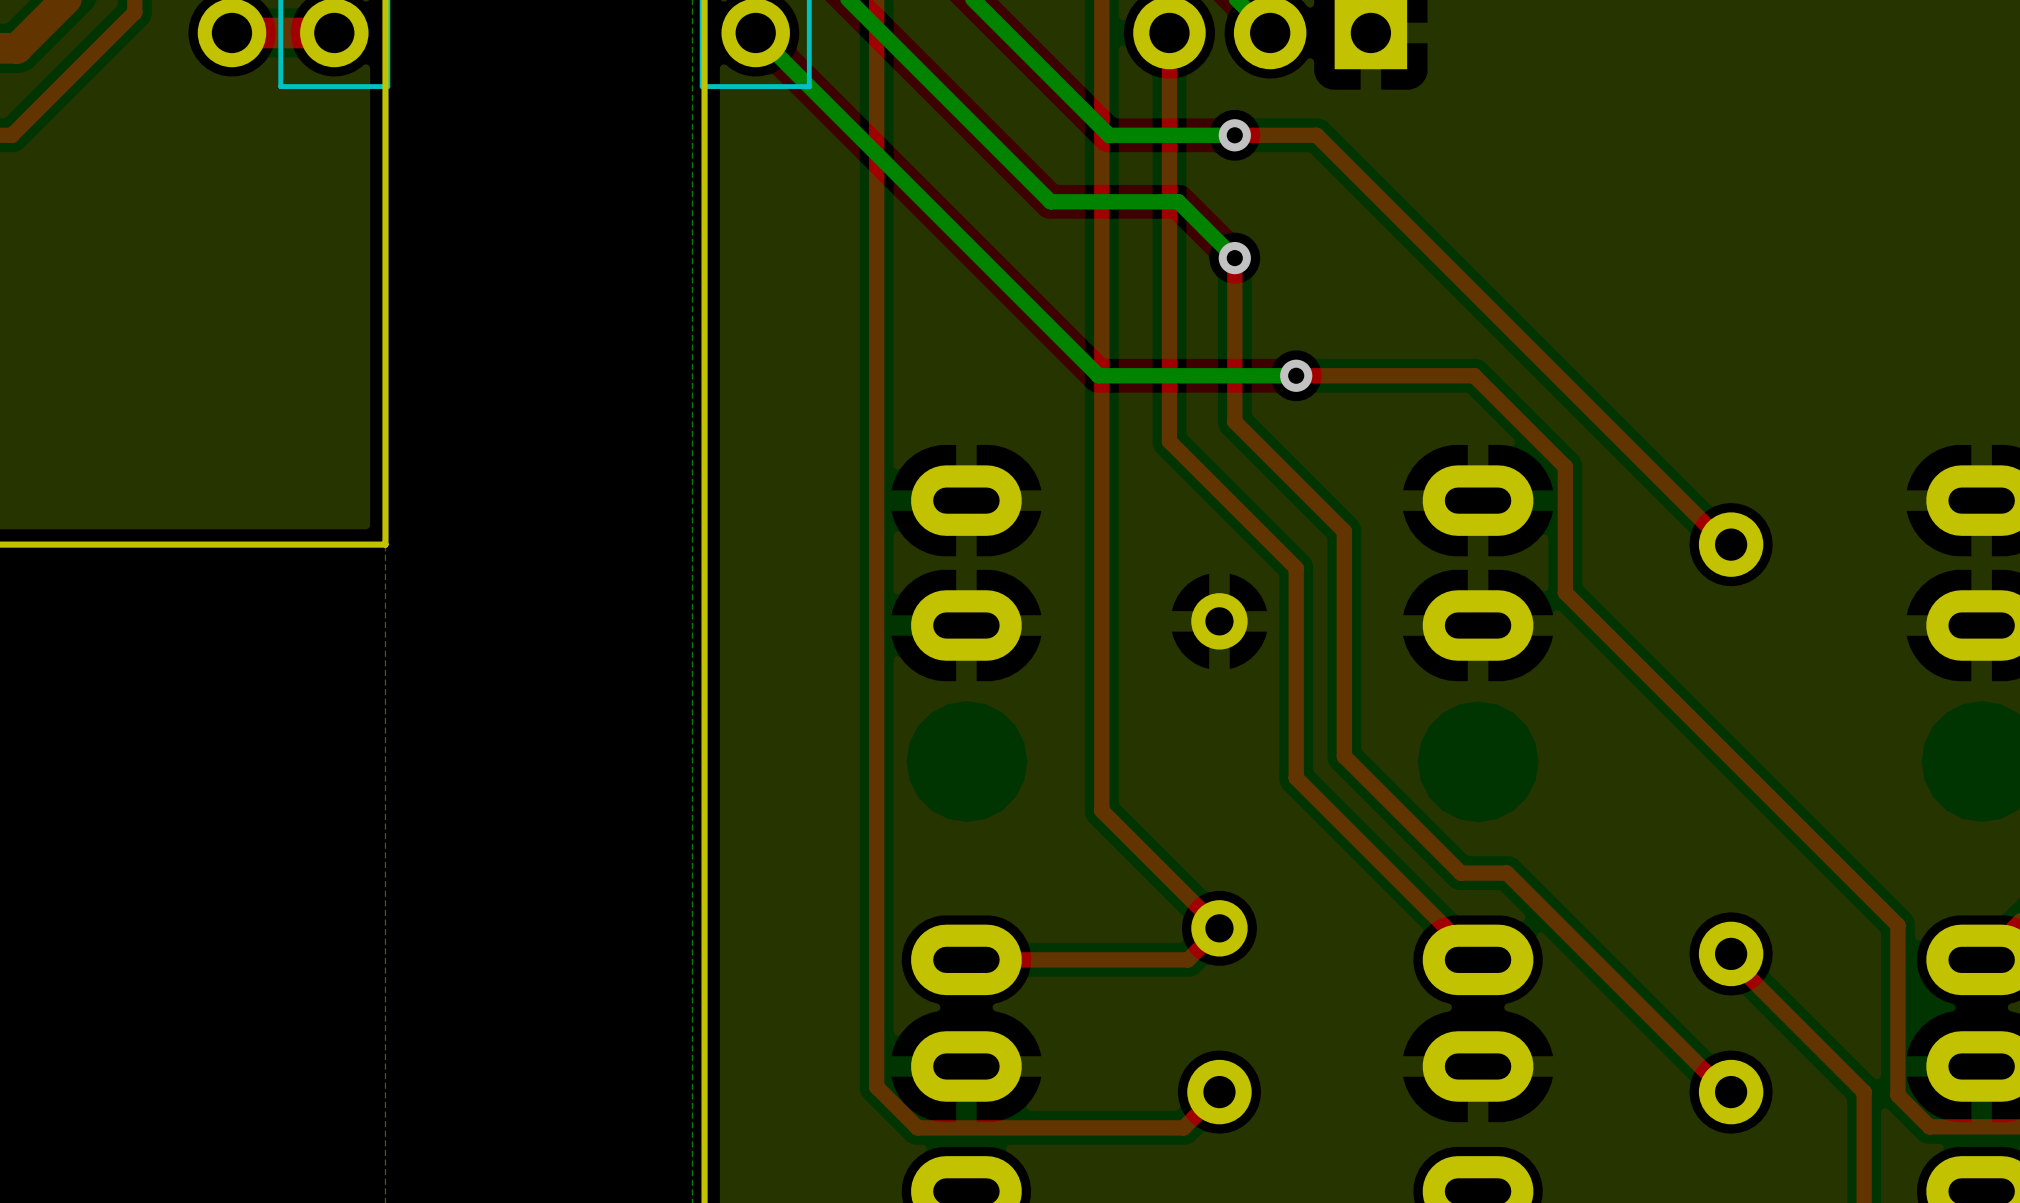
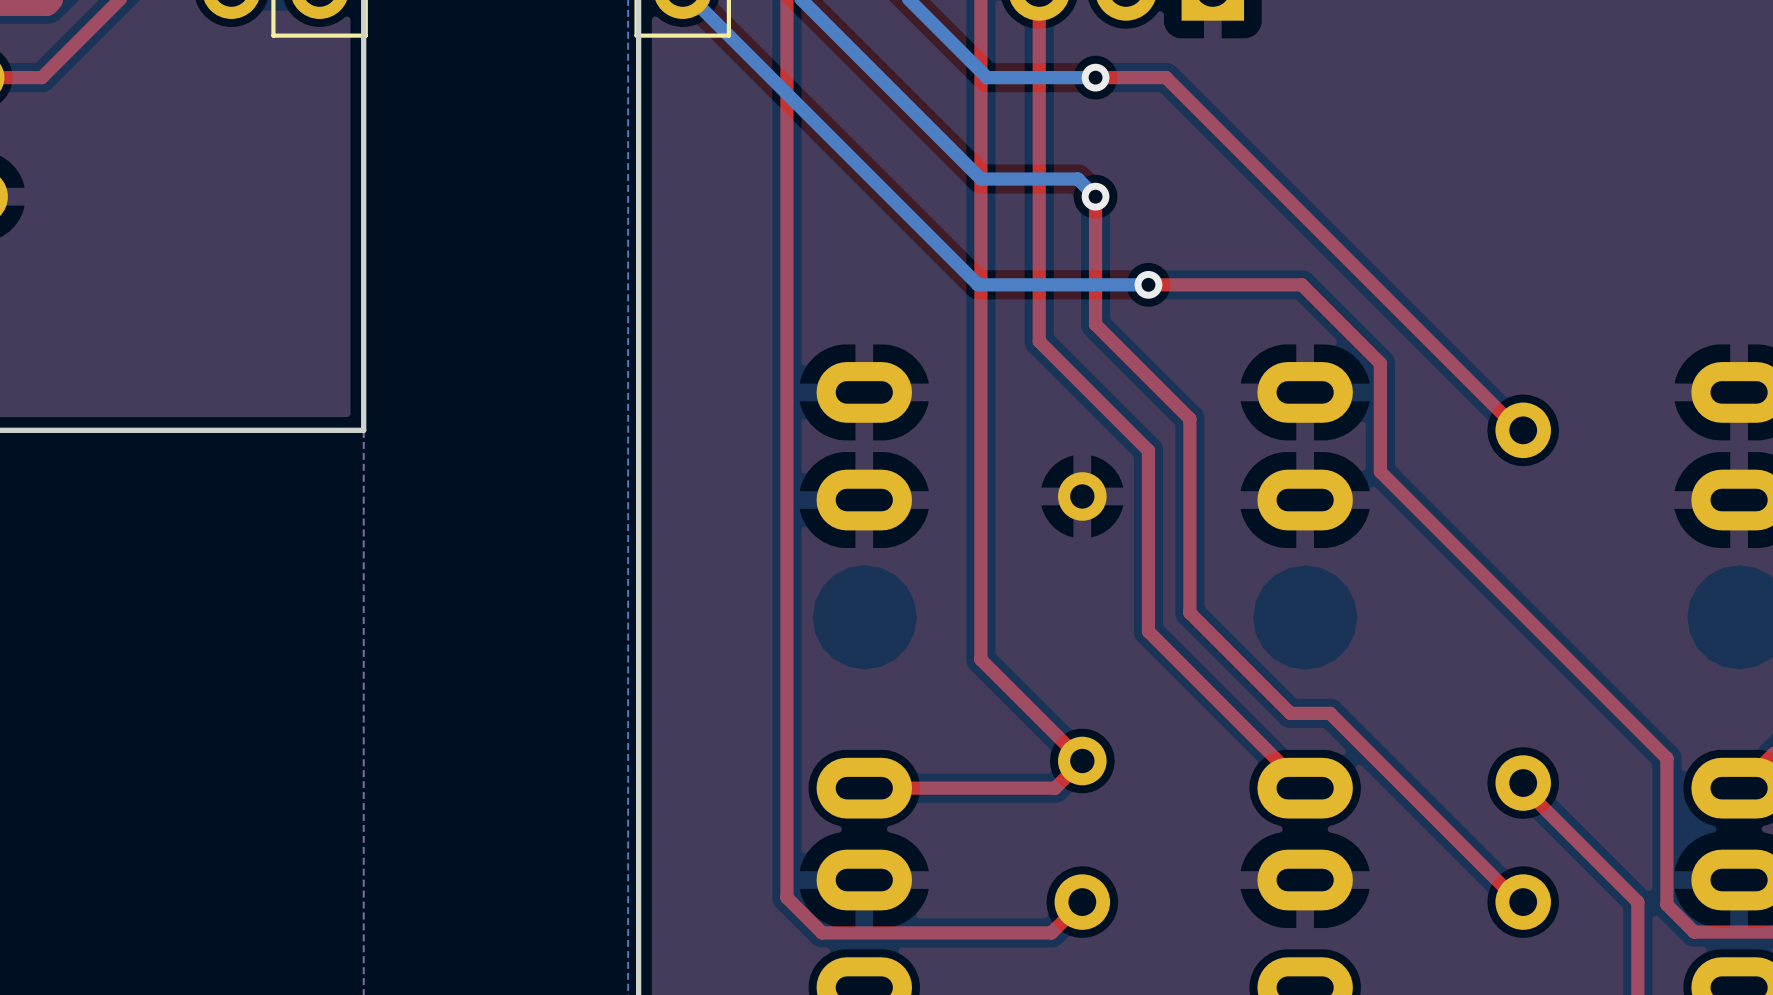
bottom track: (1050, 201) (1178, 201) (1234, 258) -> (936, 134) (980, 179) (1077, 179) (1095, 196)
via position: (1234, 258) -> (1095, 196)

